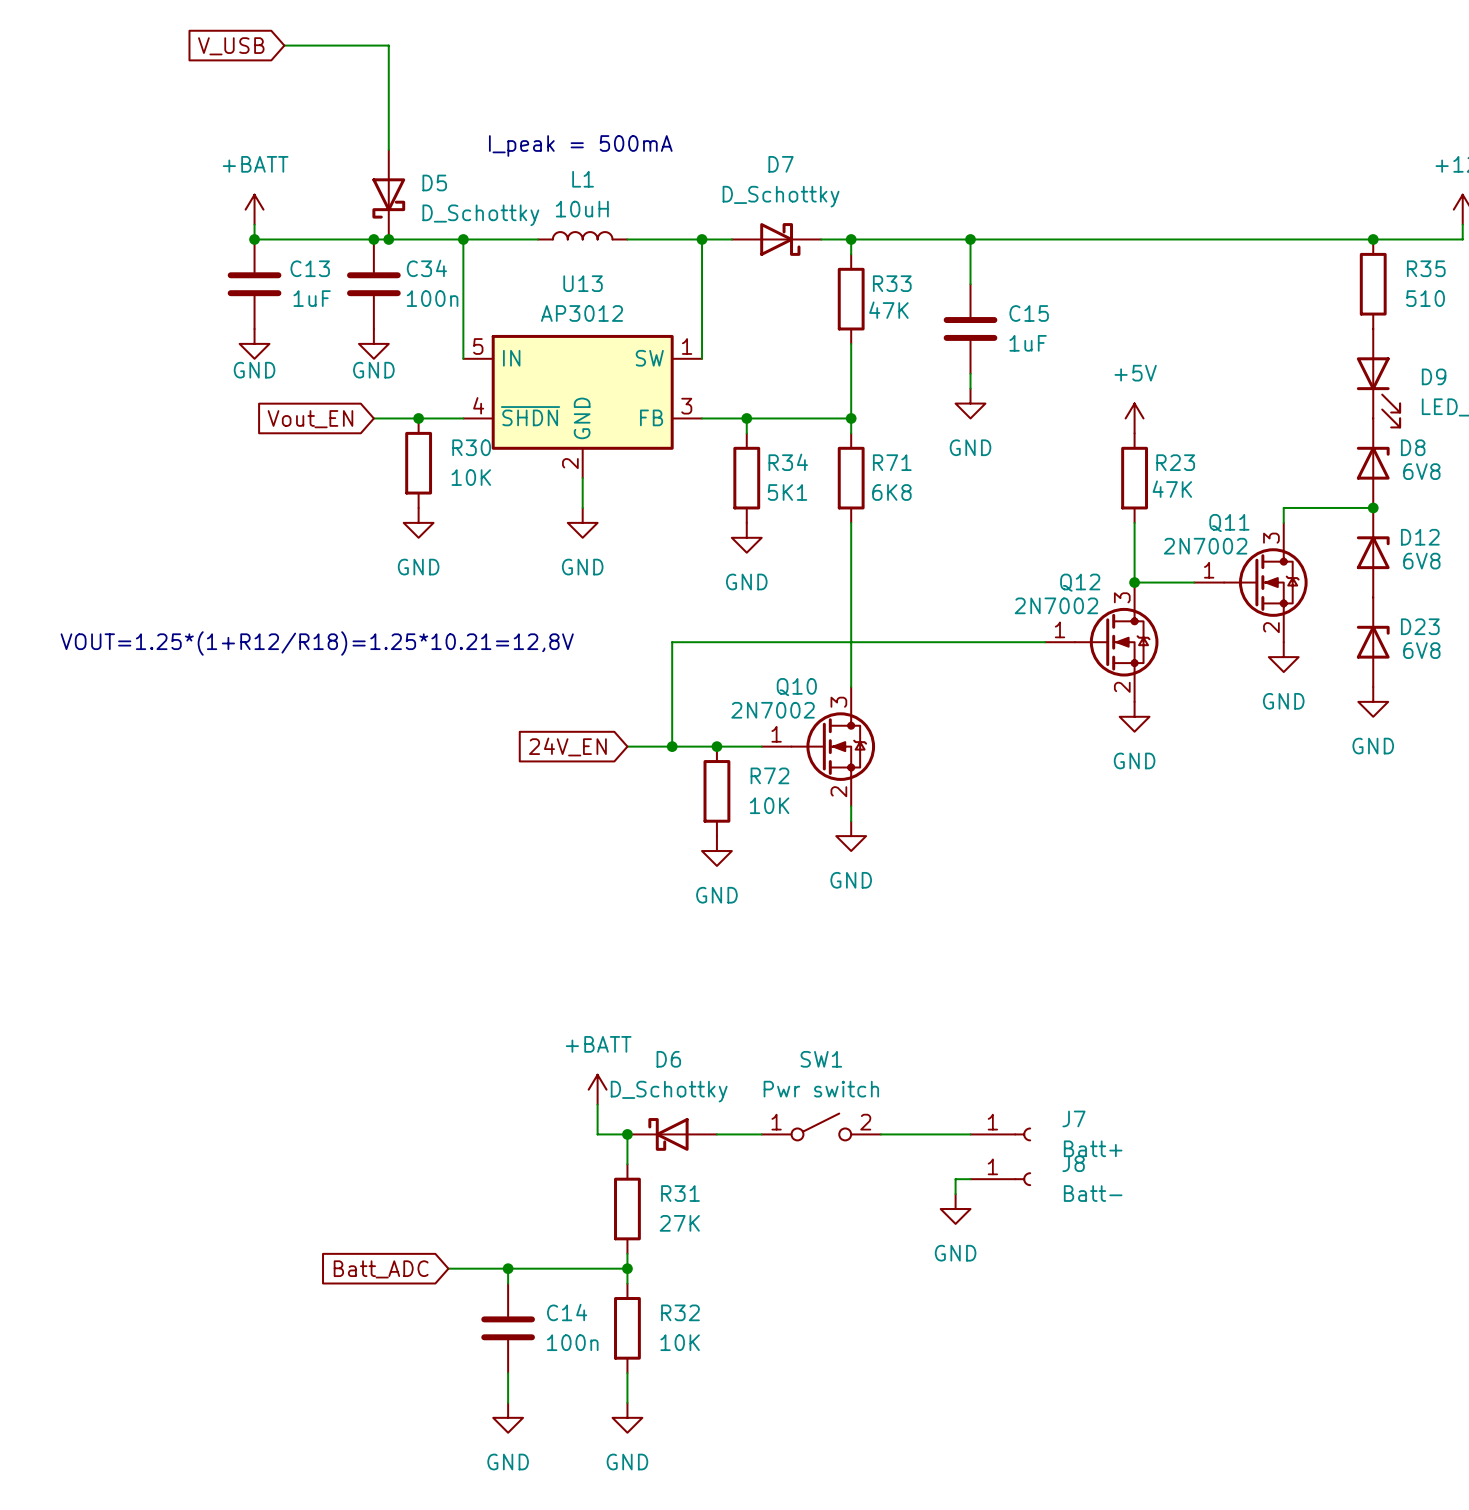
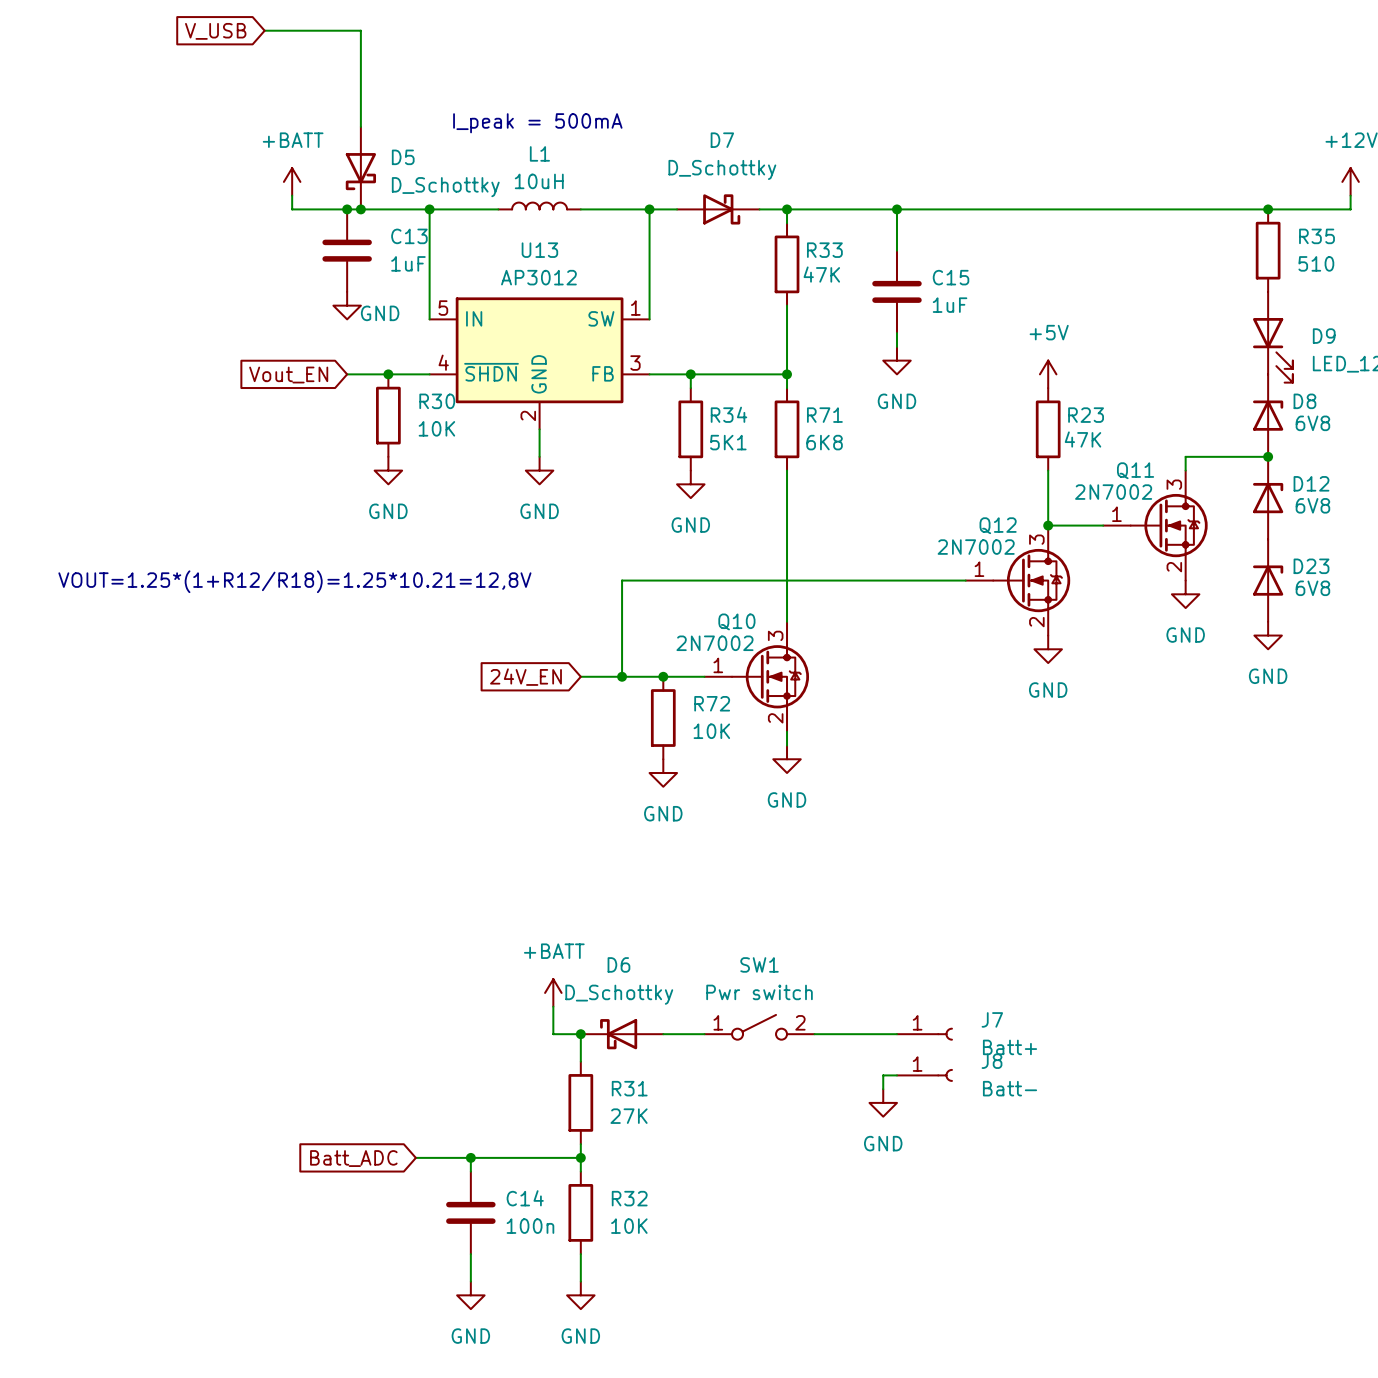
power symbol position: +BATT (254, 209) -> +BATT (292, 181)
wire: (254, 224) (254, 239) (314, 239) -> (292, 195) (292, 209)
junction: (254, 239) -> none
C34 name: C34 (426, 268) -> C13 (409, 236)
C13: 1uF (254, 284) -> none
C34 value: 100n (432, 298) -> 1uF (408, 263)
power symbol: GND (254, 343) -> none
power symbol text position: GND (373, 370) -> GND (380, 313)

